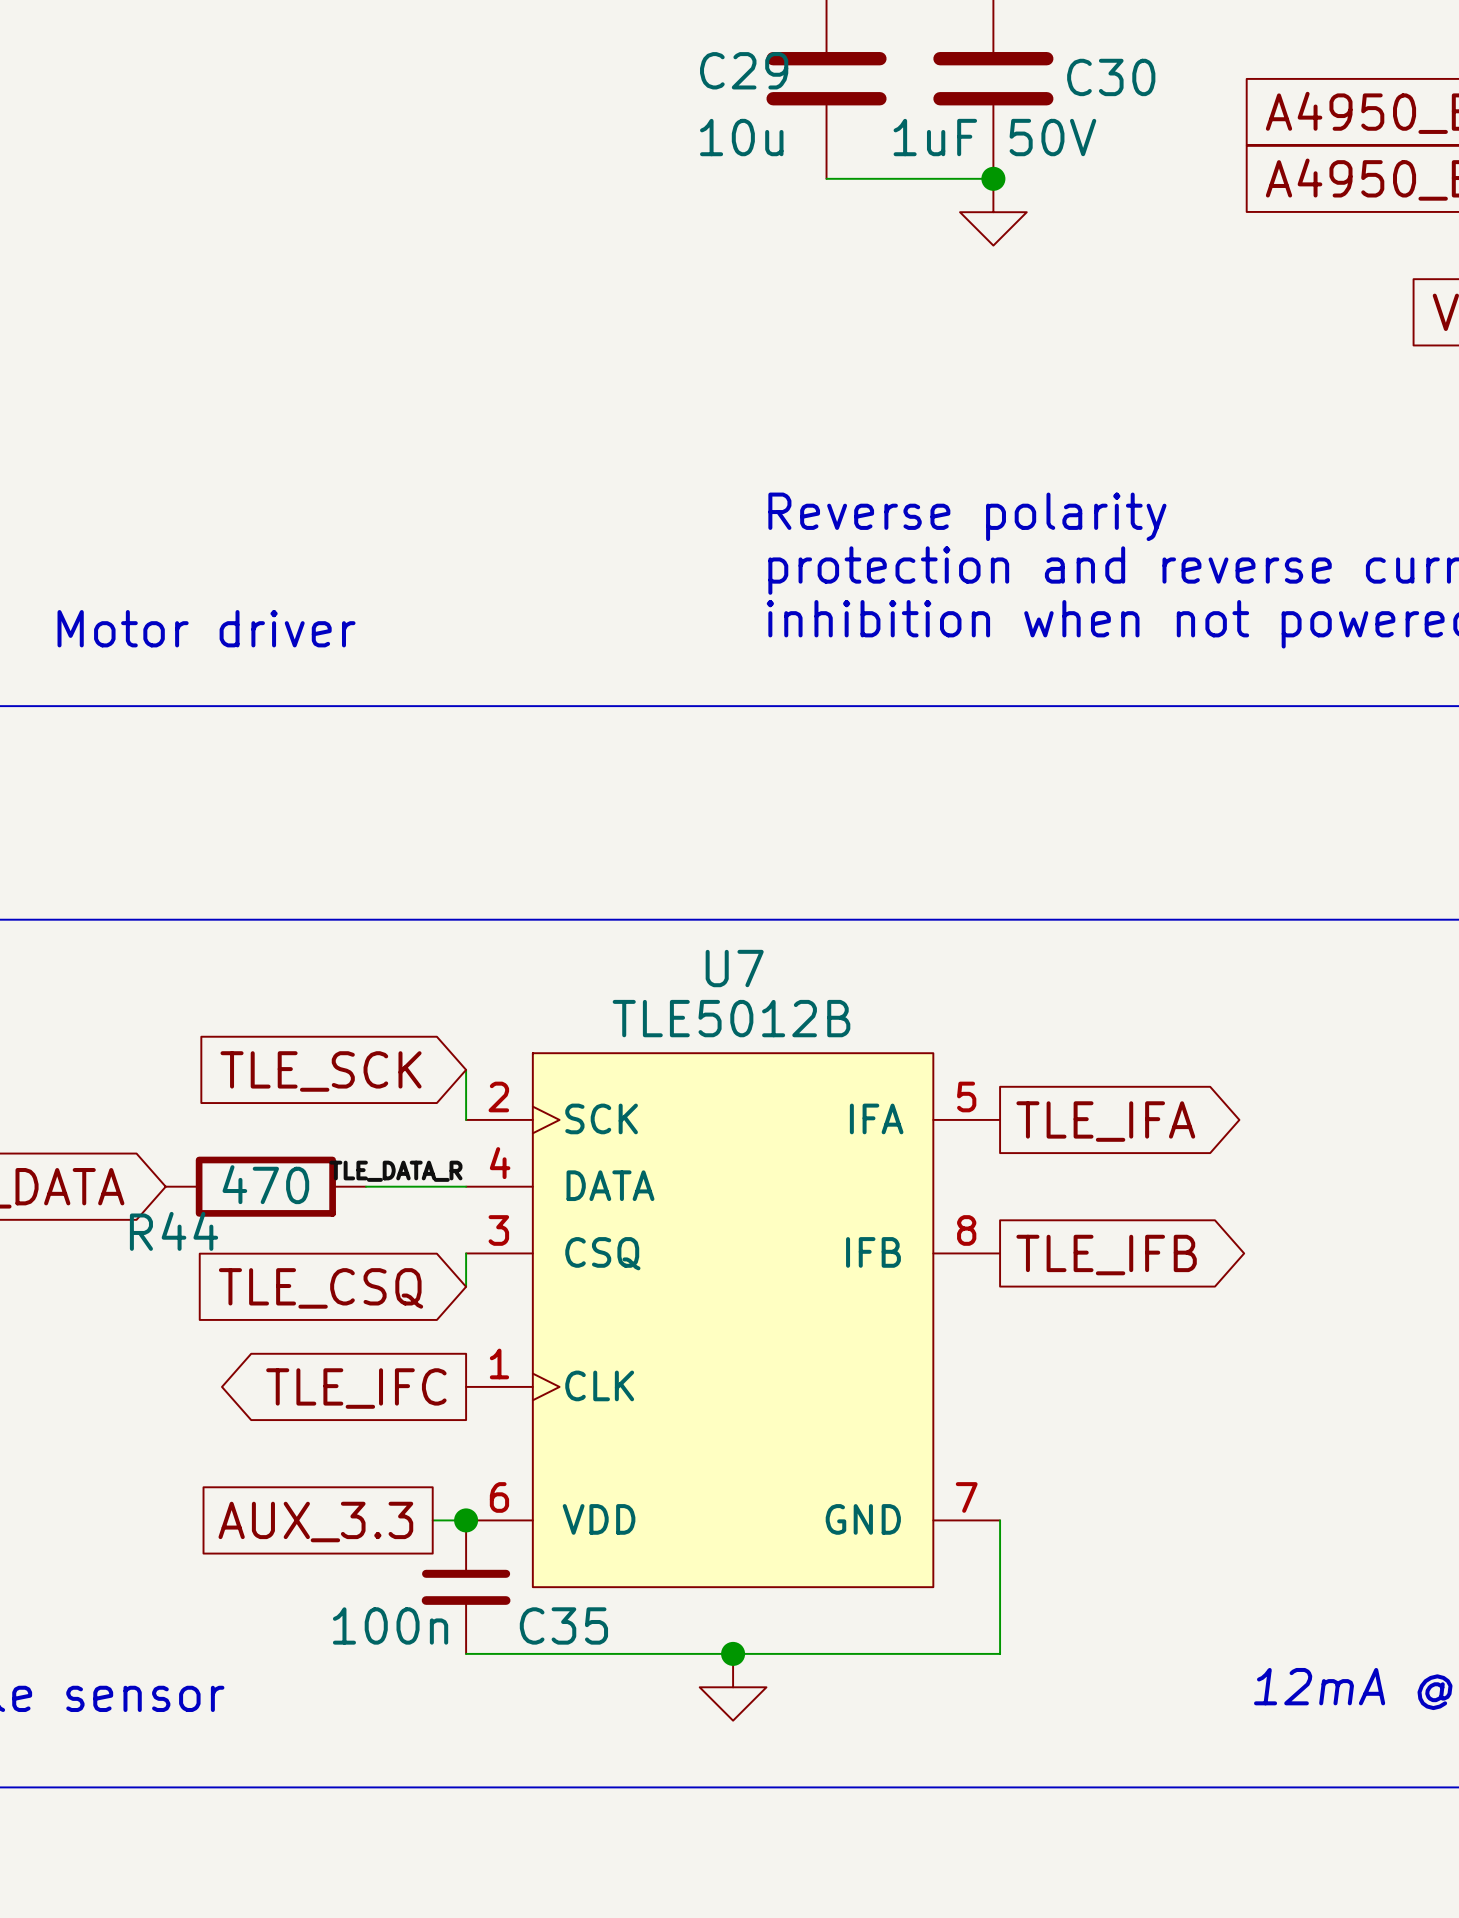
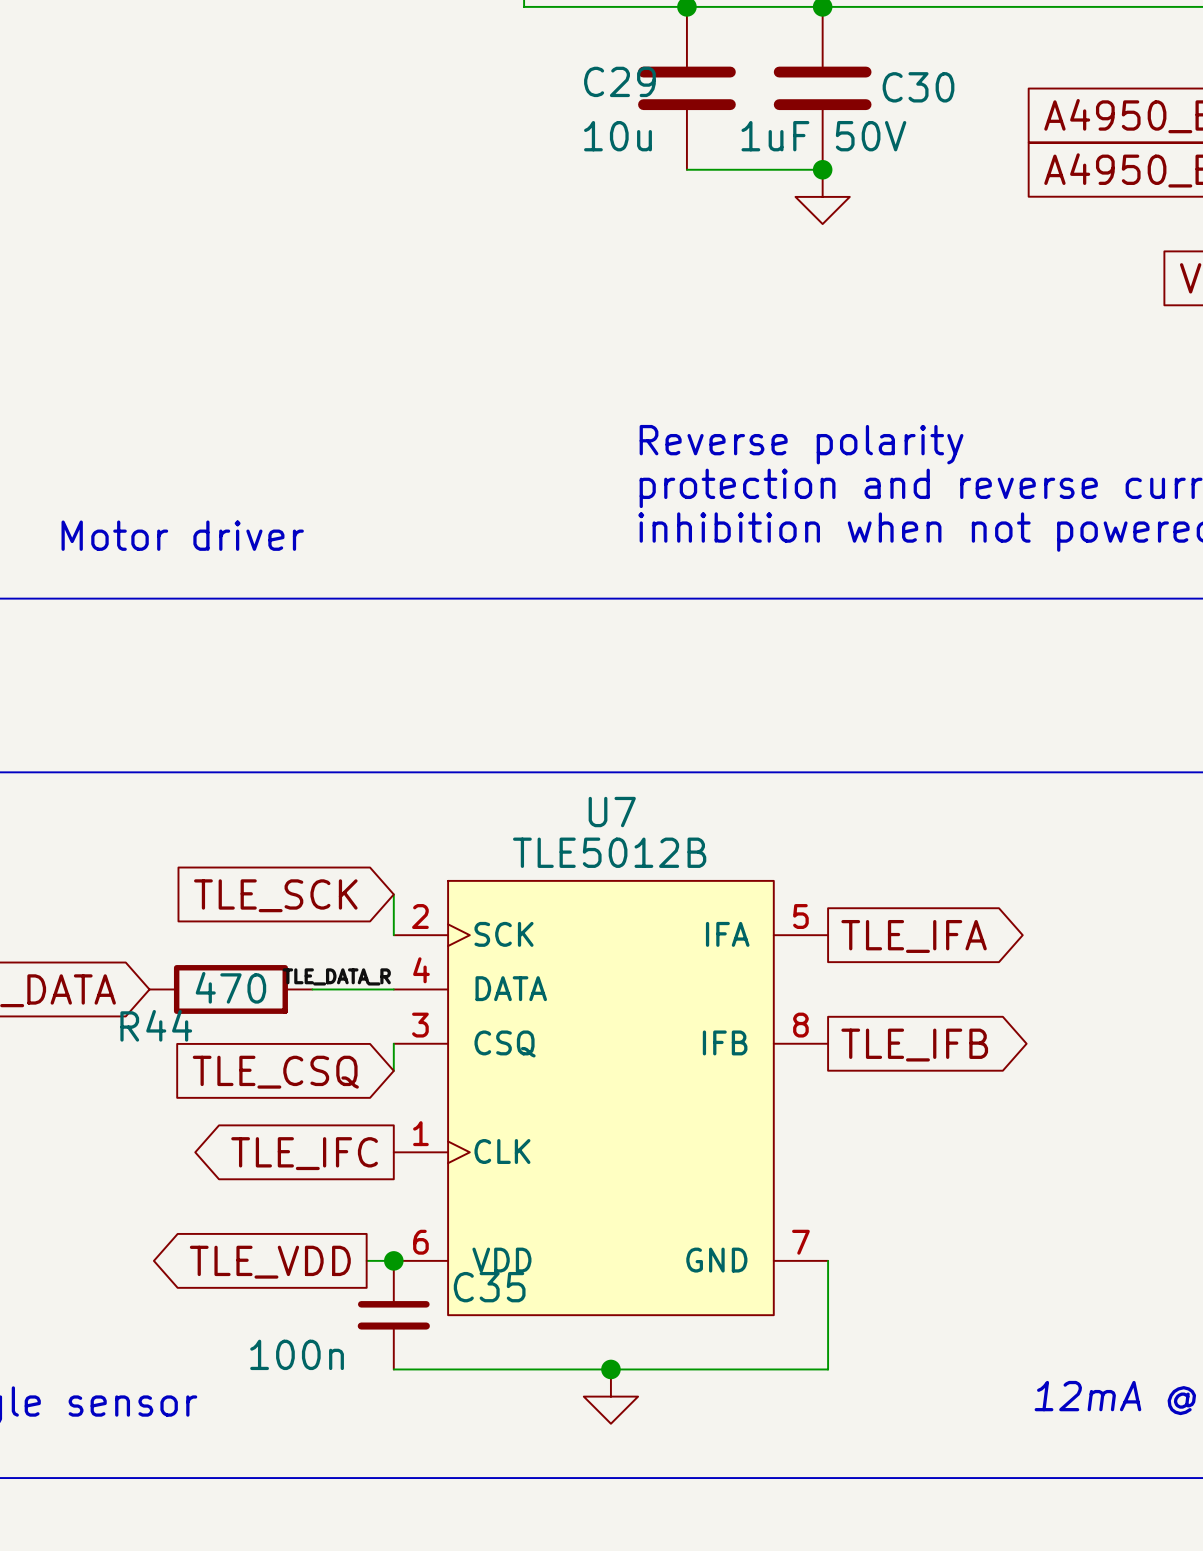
global label shape: passive (315, 1522) -> output (270, 1262)
global label: AUX_3.3 (315, 1522) -> TLE_VDD (270, 1262)
C35 value position: 100n (390, 1625) -> 100n (297, 1354)
C35 name position: C35 (563, 1625) -> C35 (489, 1287)

